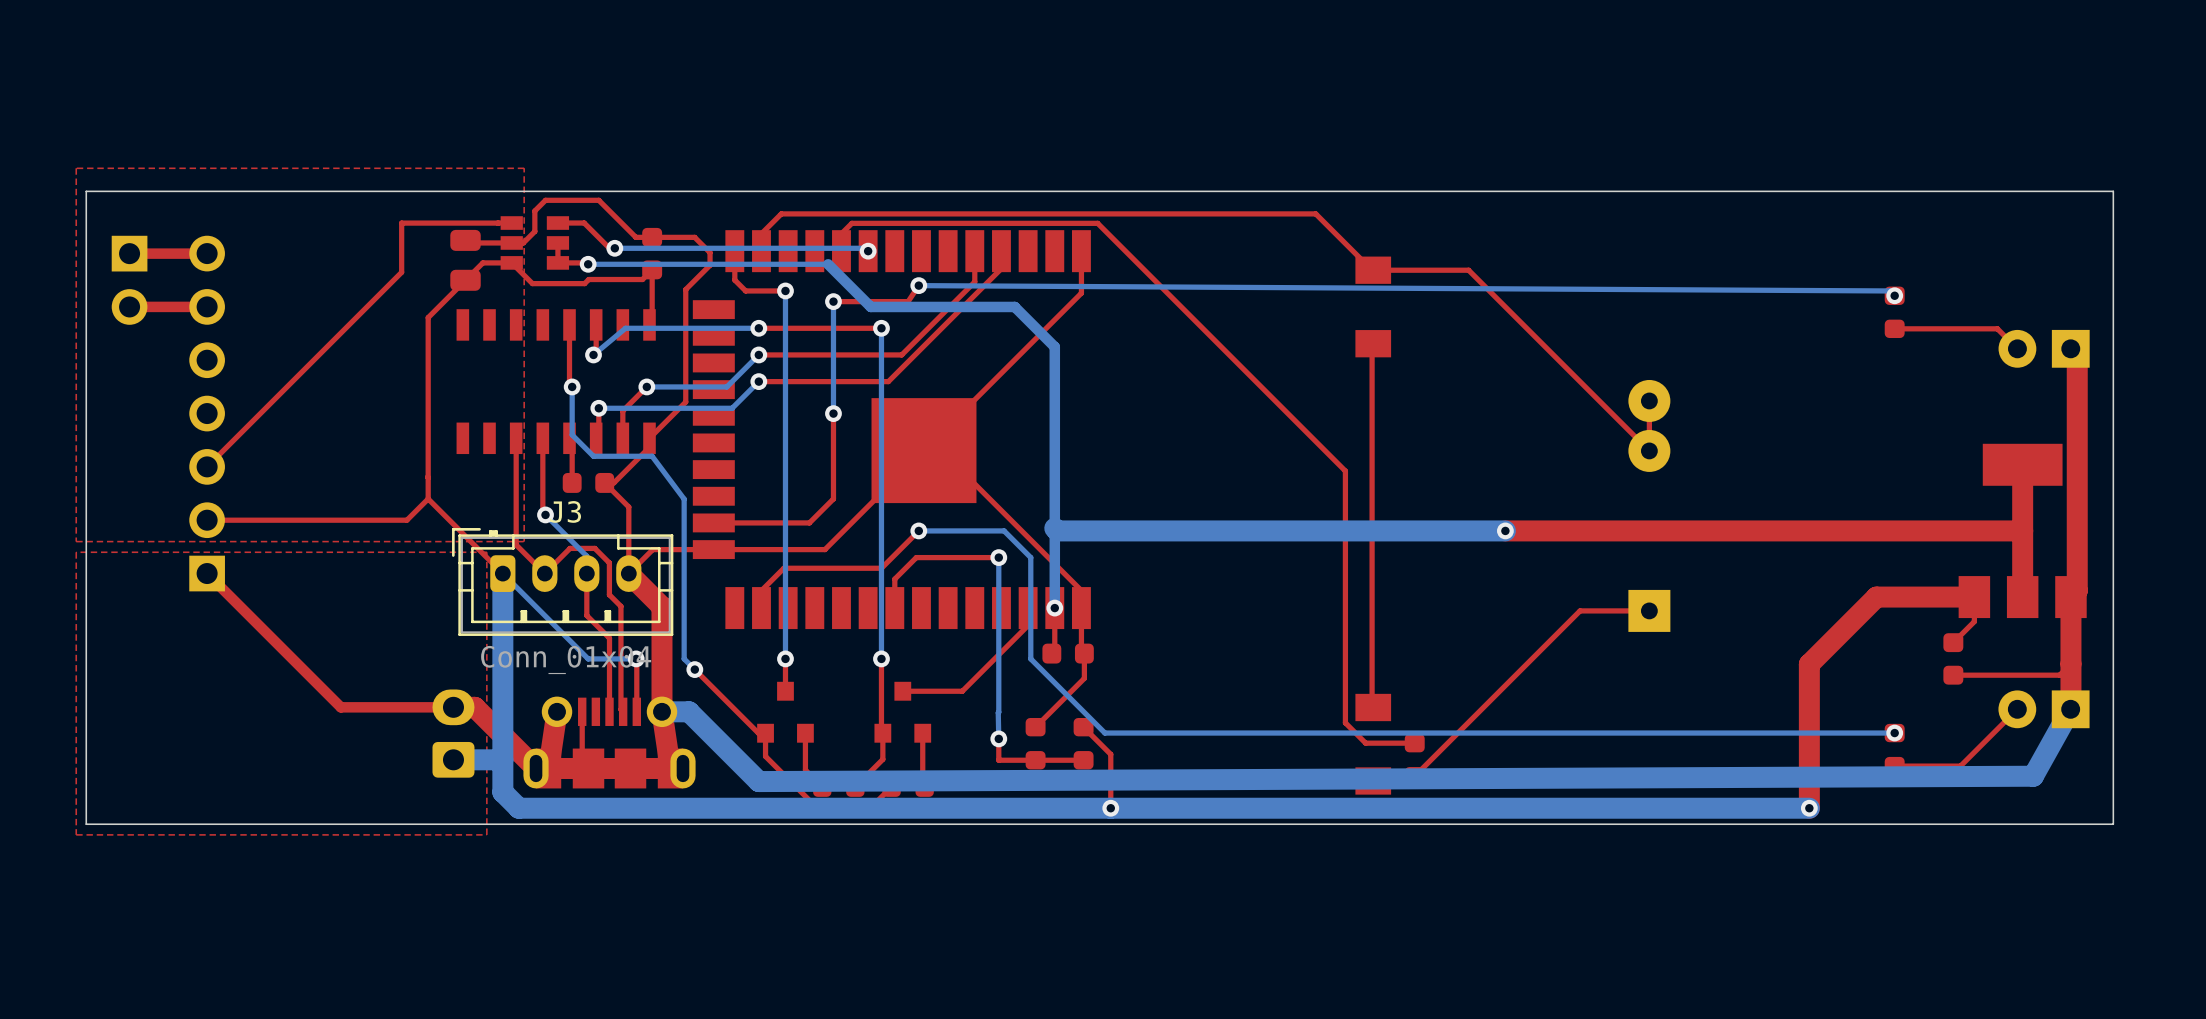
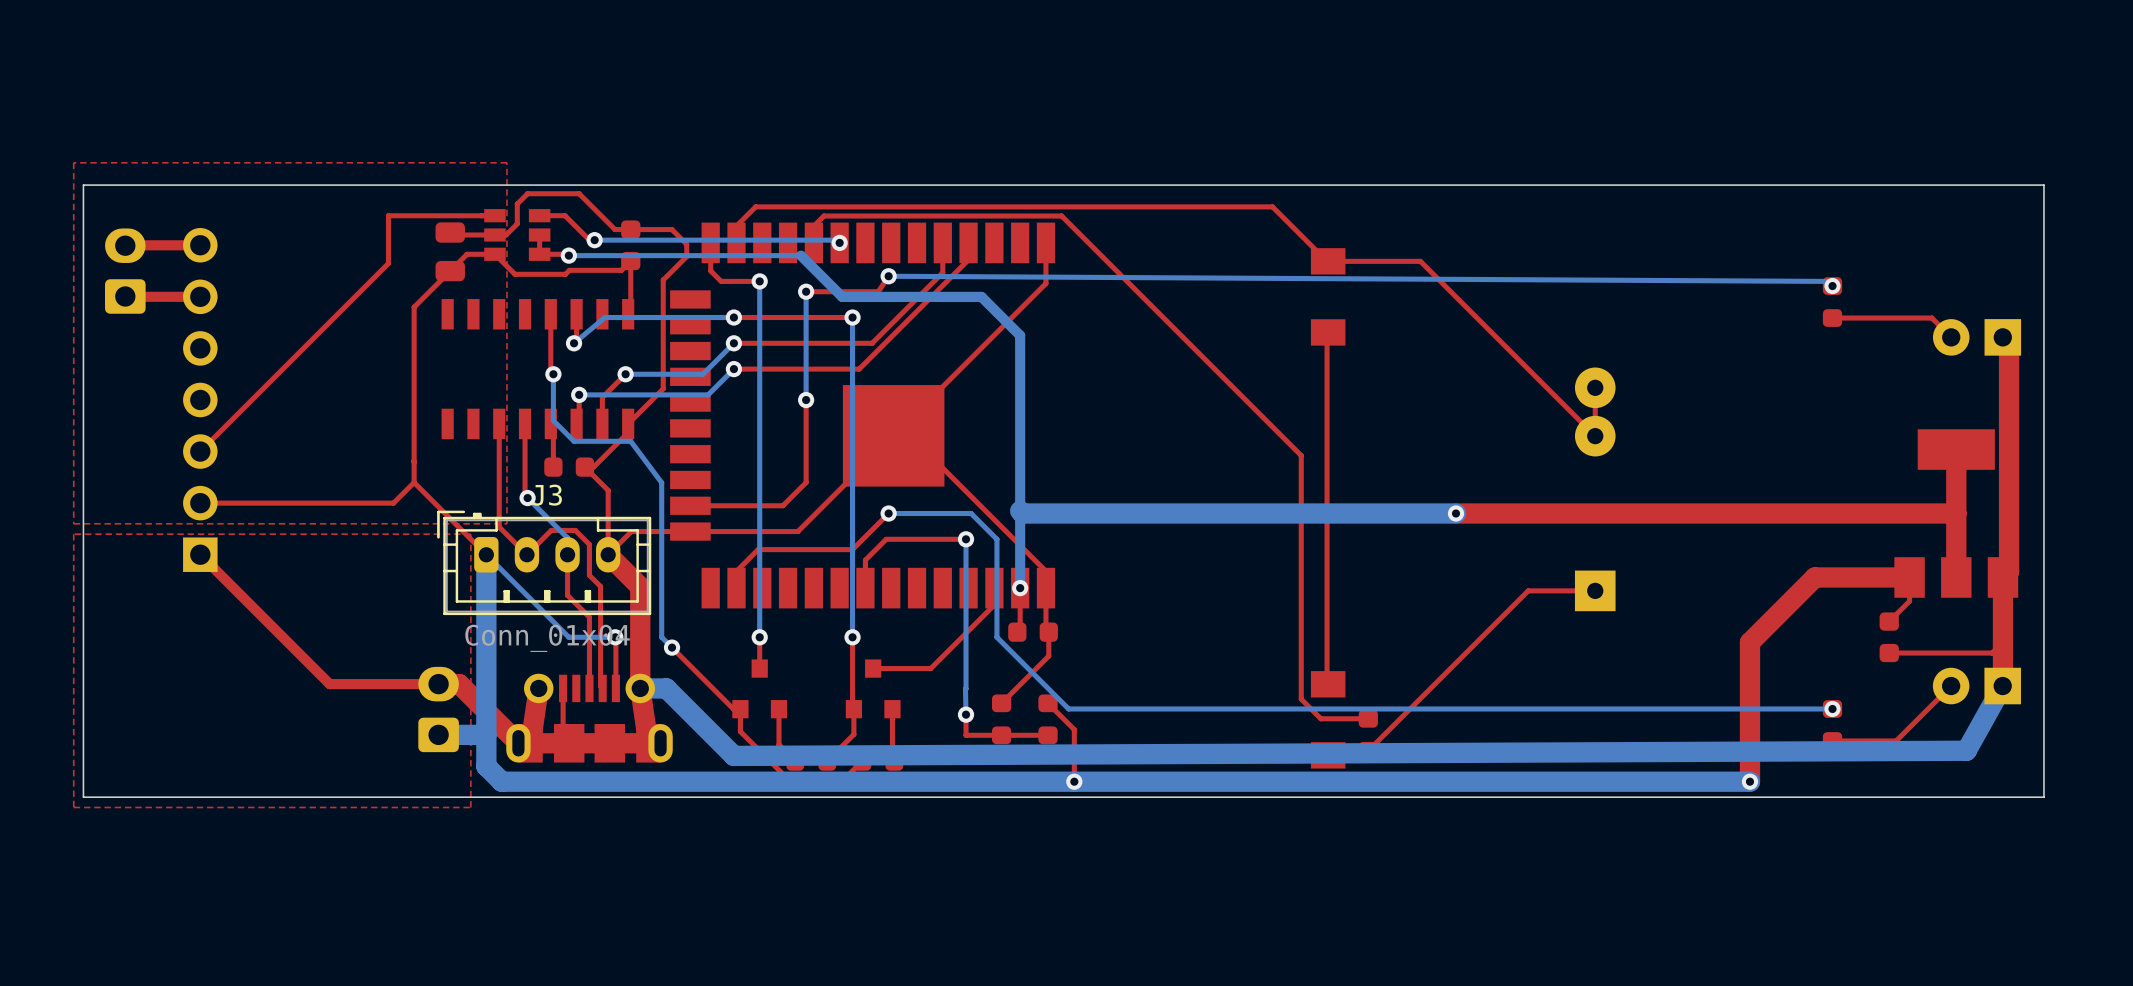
part footprint: [111, 235, 148, 325] -> [105, 228, 146, 314]

